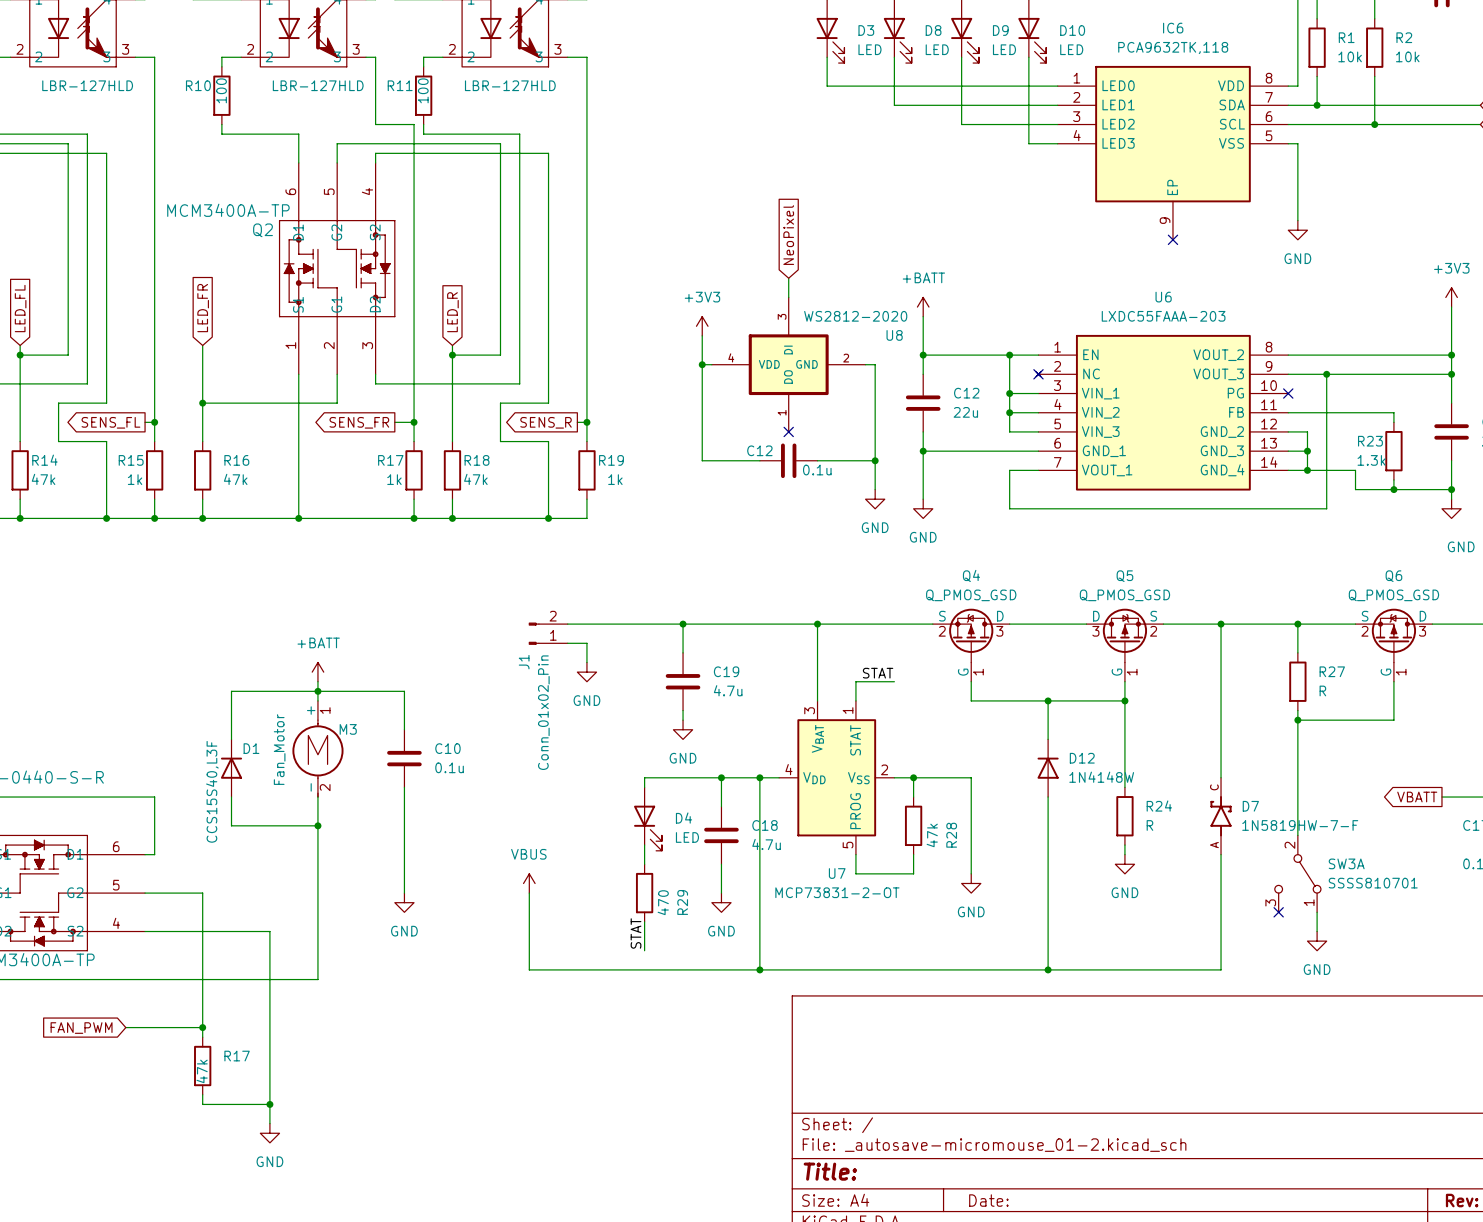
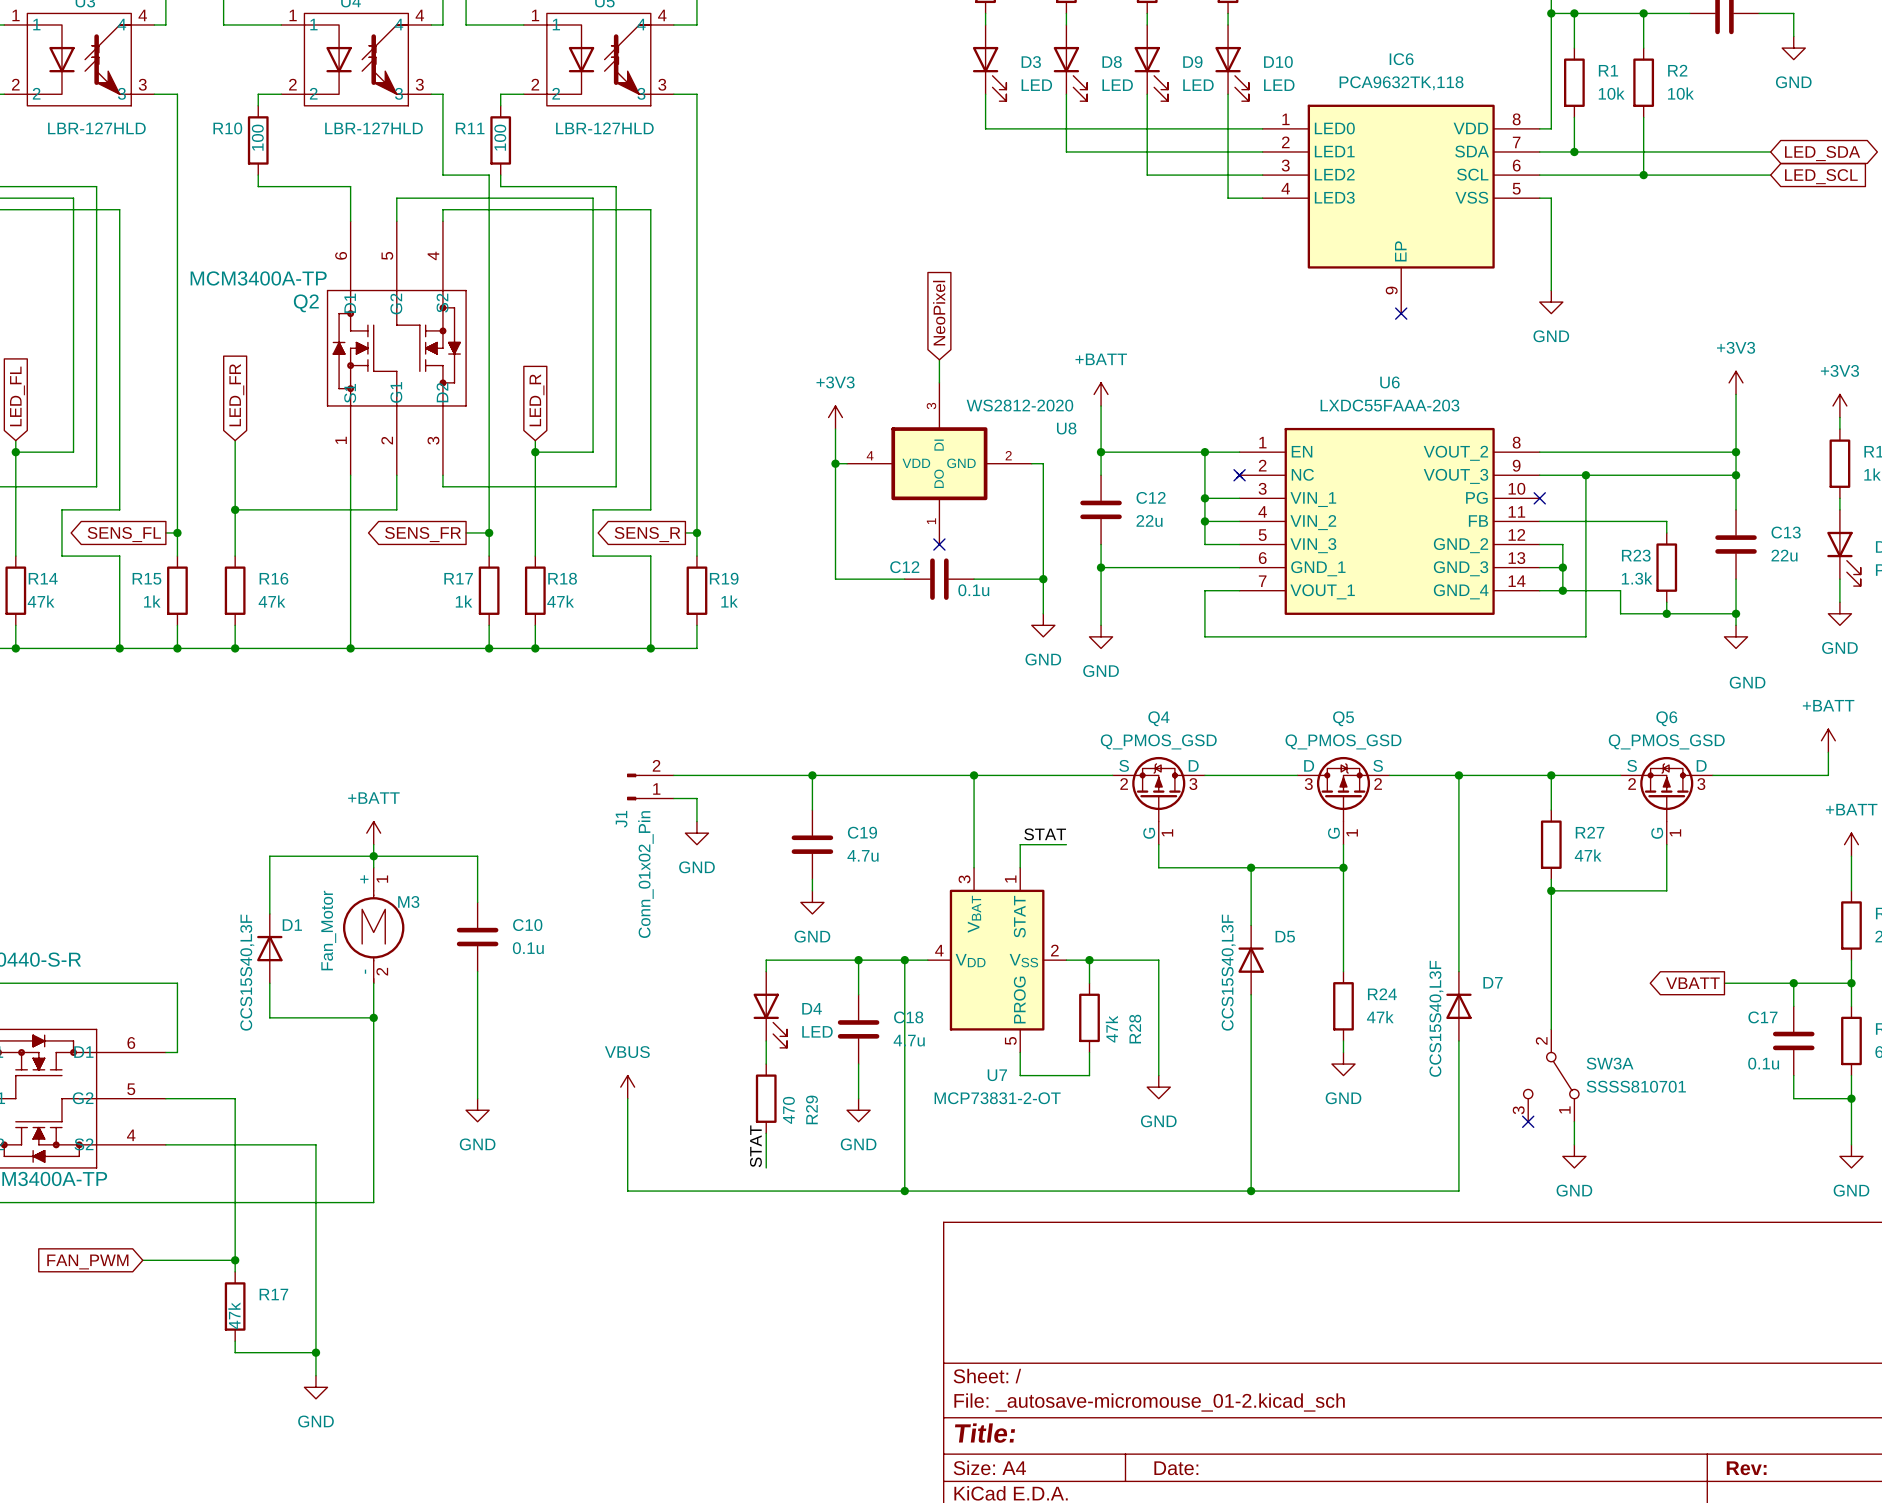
R27 value: R (1322, 690) -> 47k (1588, 855)
D12: 1N4148W (1048, 768) -> none
D5: none -> CCS15S40,L3F (1251, 960)
D7 symbol: [1210, 777, 1232, 855] -> [1446, 971, 1472, 1041]
R24 value: R (1149, 825) -> 47k (1380, 1017)
D7 value: 1N5819HW-7-F (1300, 825) -> CCS15S40,L3F (1436, 1018)

